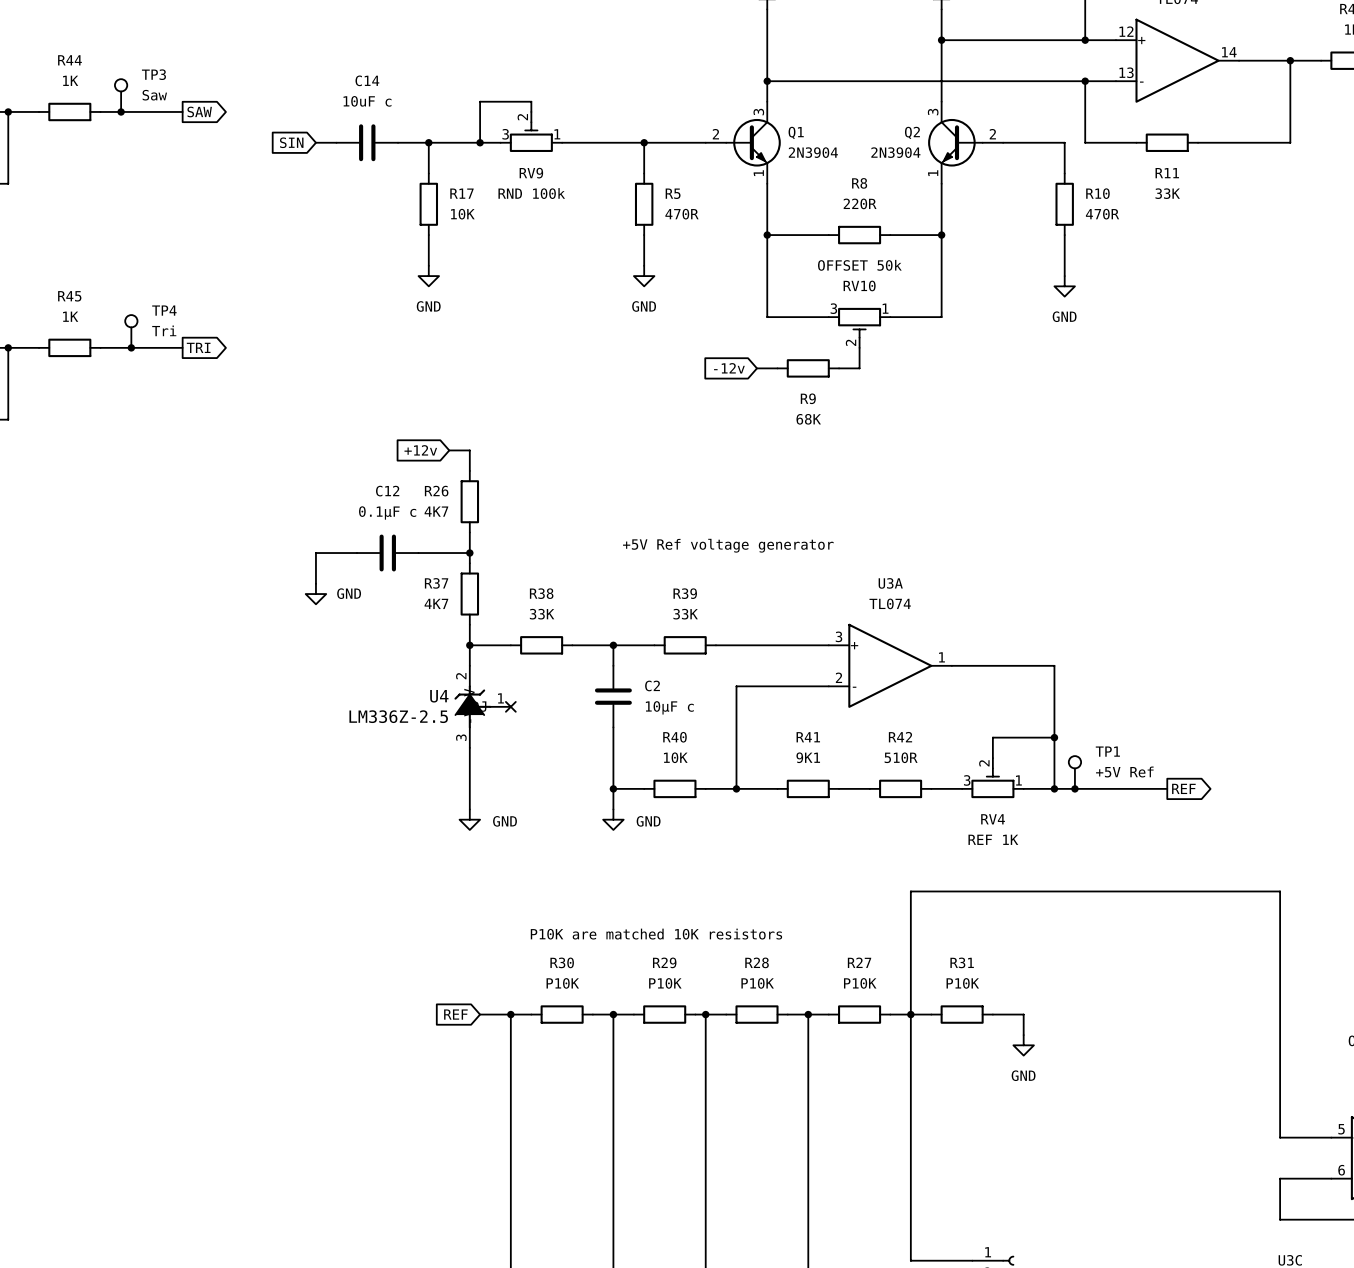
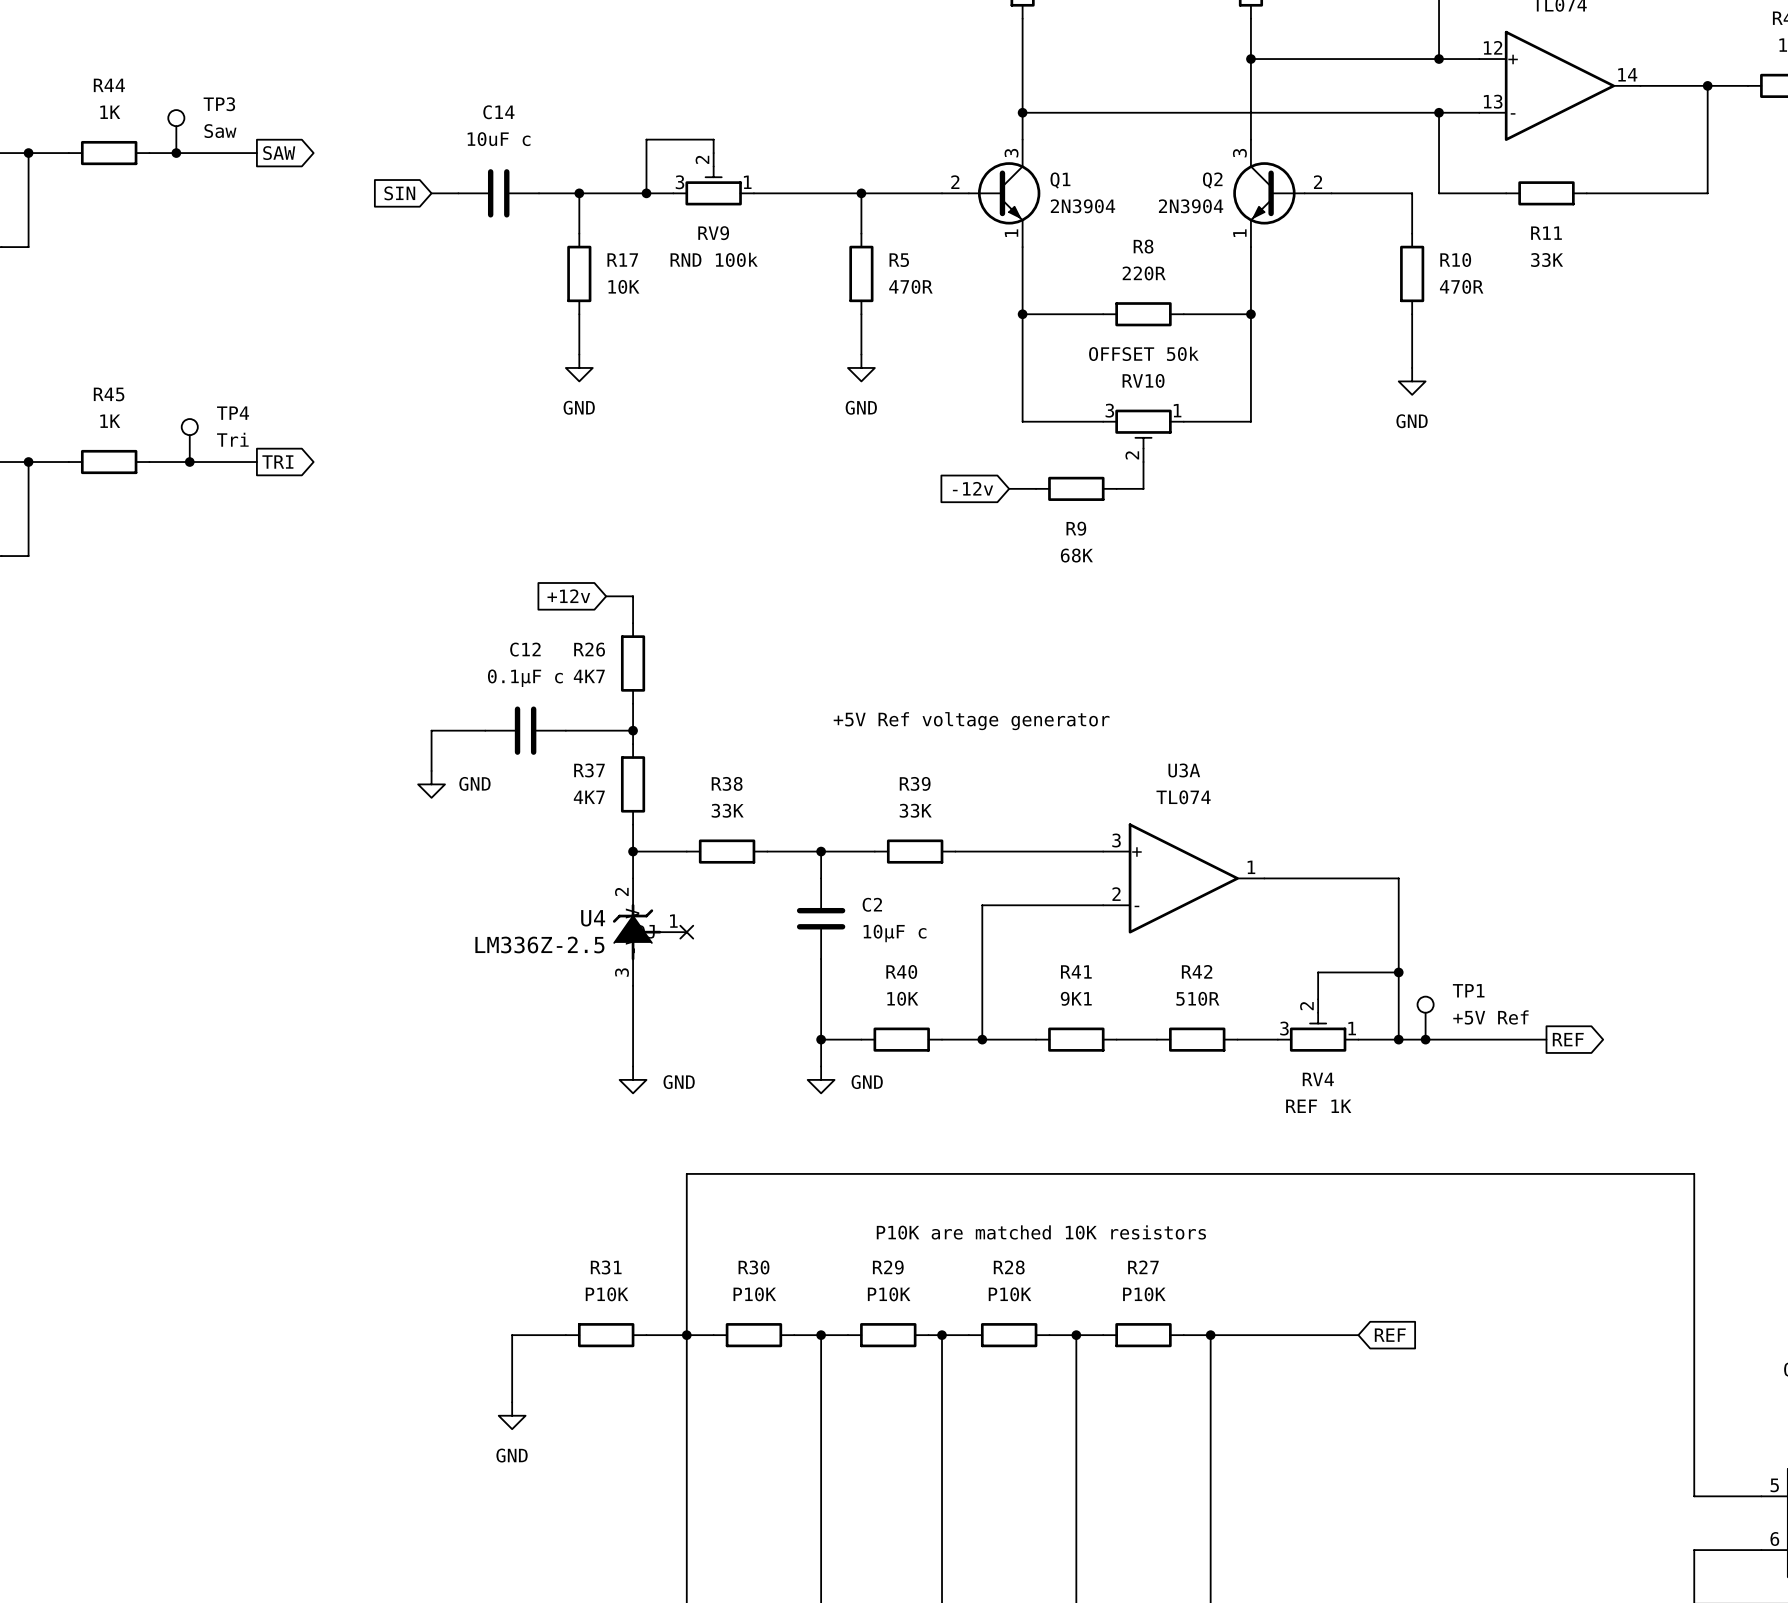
wire: (910, 891) (910, 1014) -> (1210, 1173) (686, 1173) (686, 1335)
text position: P10K are matched 10K resistors (656, 934) -> P10K are matched 10K resistors (1041, 1232)
wire: none -> (565, 1335) (512, 1335) (512, 1402)
global label: REF (455, 1014) -> none
wire: none -> (1237, 1335) (1318, 1335)
R31 position: (962, 1014) -> (606, 1335)
wire: (1023, 1014) (1023, 1035) -> none
global label: none -> REF (1390, 1335)
power symbol: GND (1023, 1045) -> none
power symbol: none -> GND (512, 1415)

